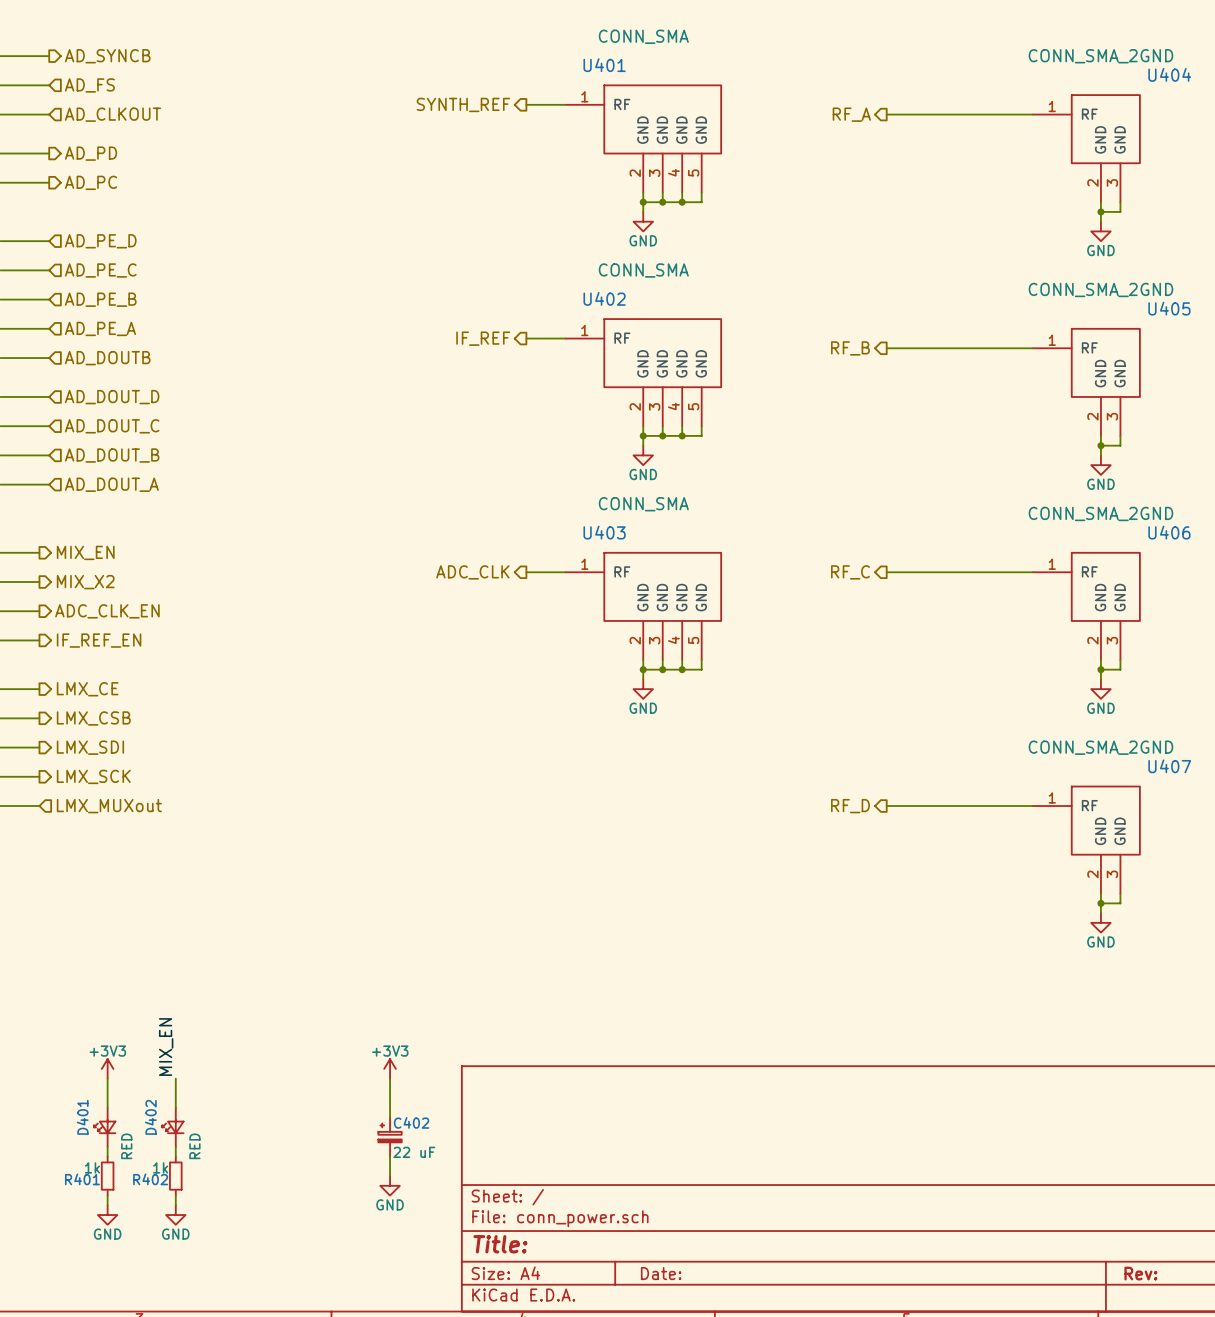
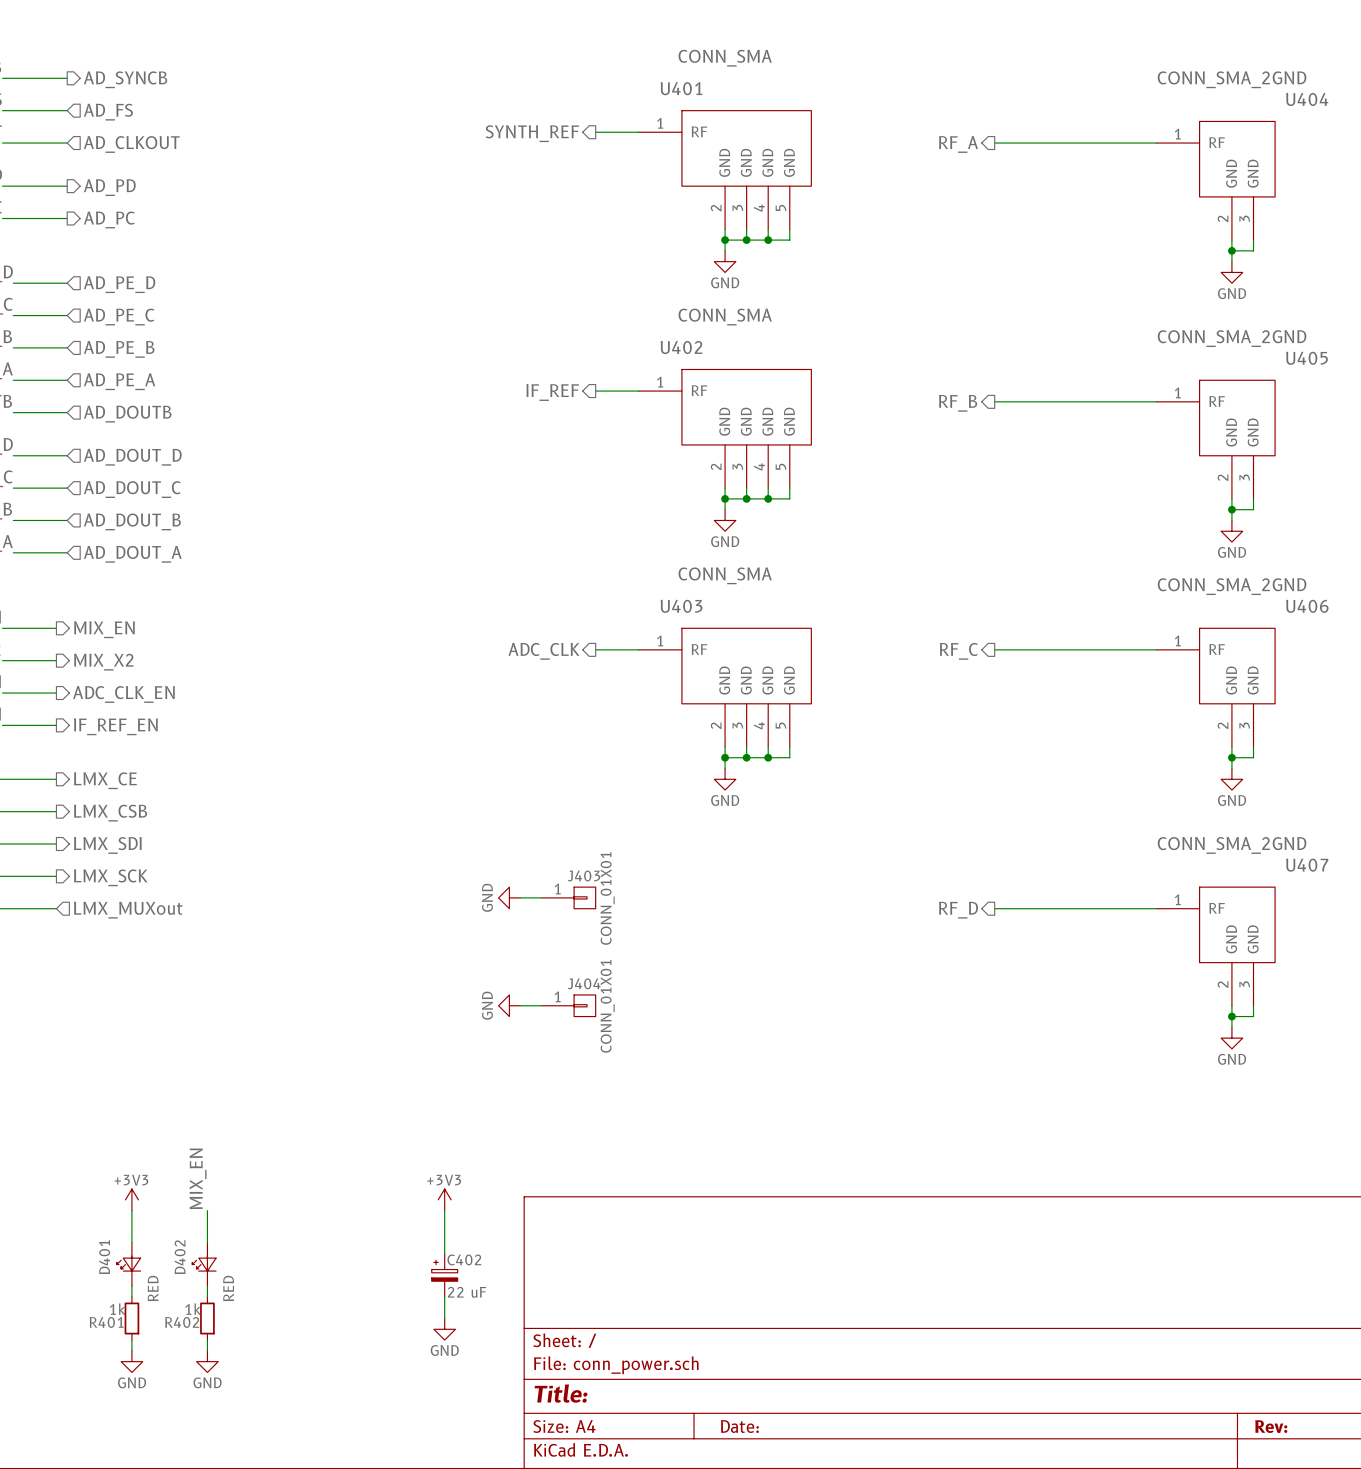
power symbol: none -> GND (509, 897)
wire: none -> (520, 897) (541, 897)
J403: none -> CONN_01X01 (568, 897)
power symbol: none -> GND (509, 1005)
wire: none -> (520, 1005) (541, 1005)
J404: none -> CONN_01X01 (568, 1005)

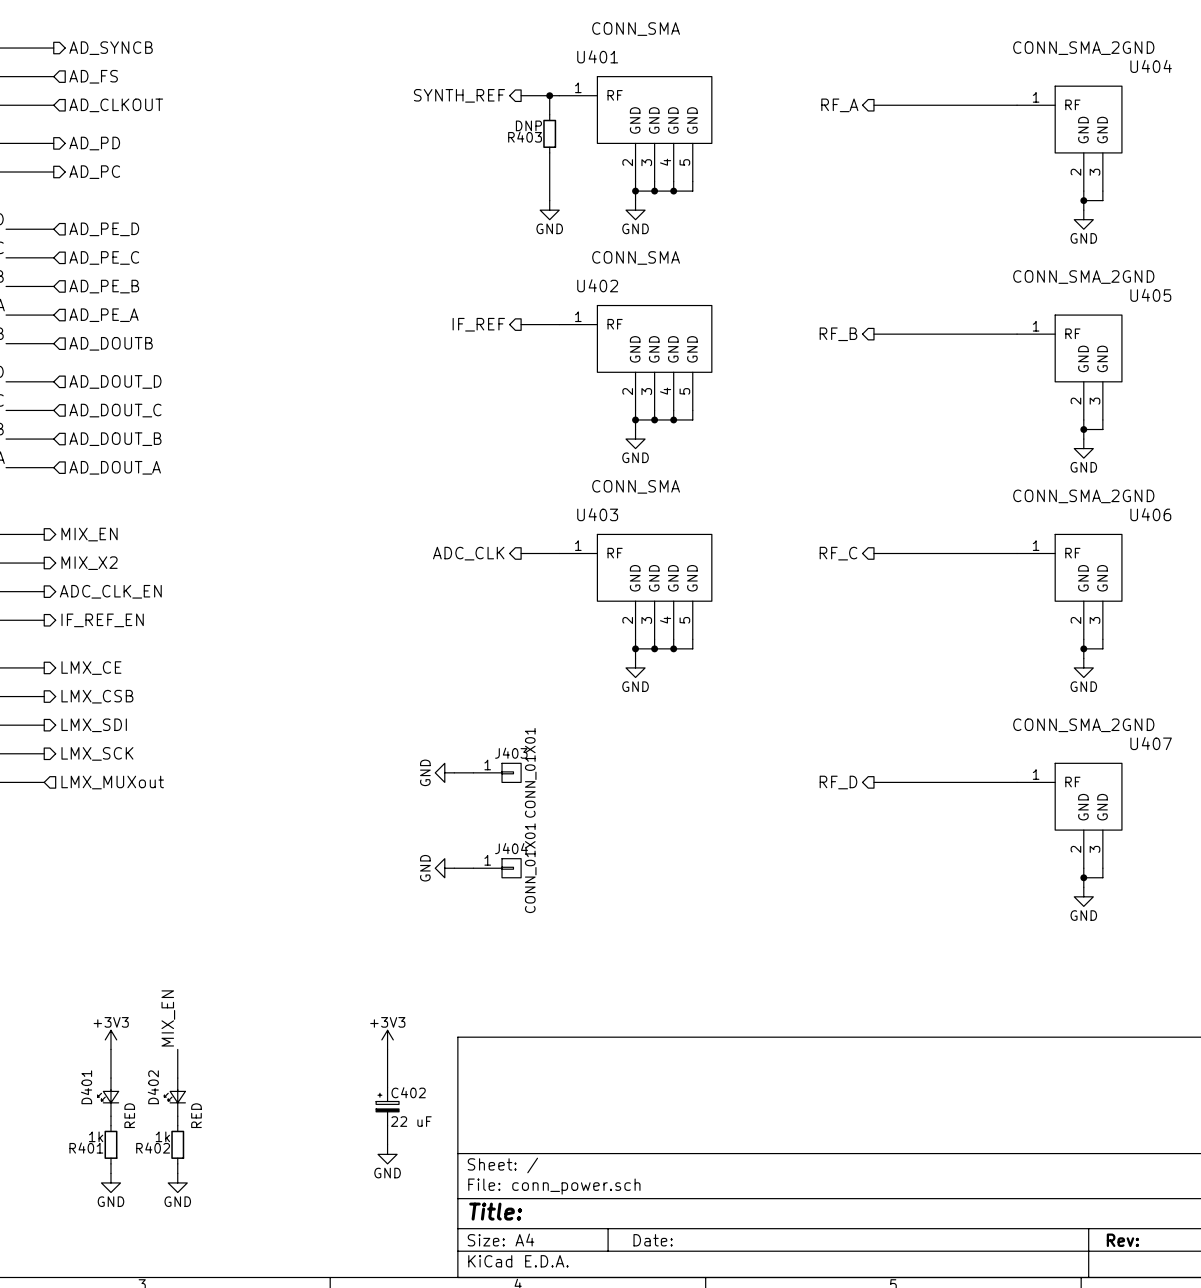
wire: none -> (549, 95) (549, 114)
junction: none -> (549, 95)
R403: none -> DNP (549, 133)
wire: none -> (549, 152) (549, 200)
power symbol: none -> GND (549, 210)

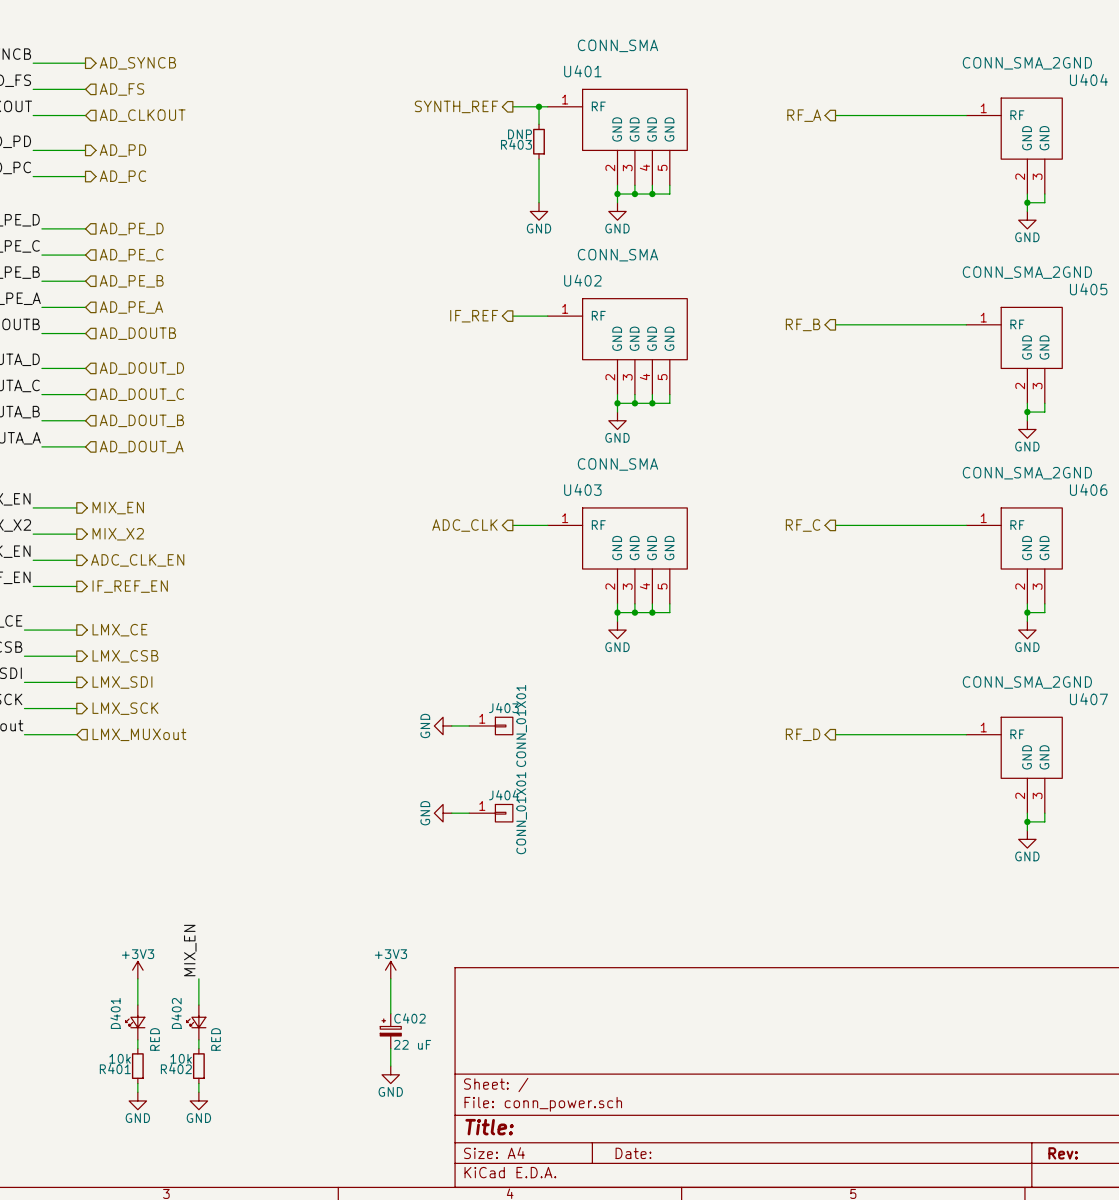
R401 value: 1k (96, 1136) -> 10k (120, 1058)
R402 value: 1k (162, 1136) -> 10k (181, 1058)

